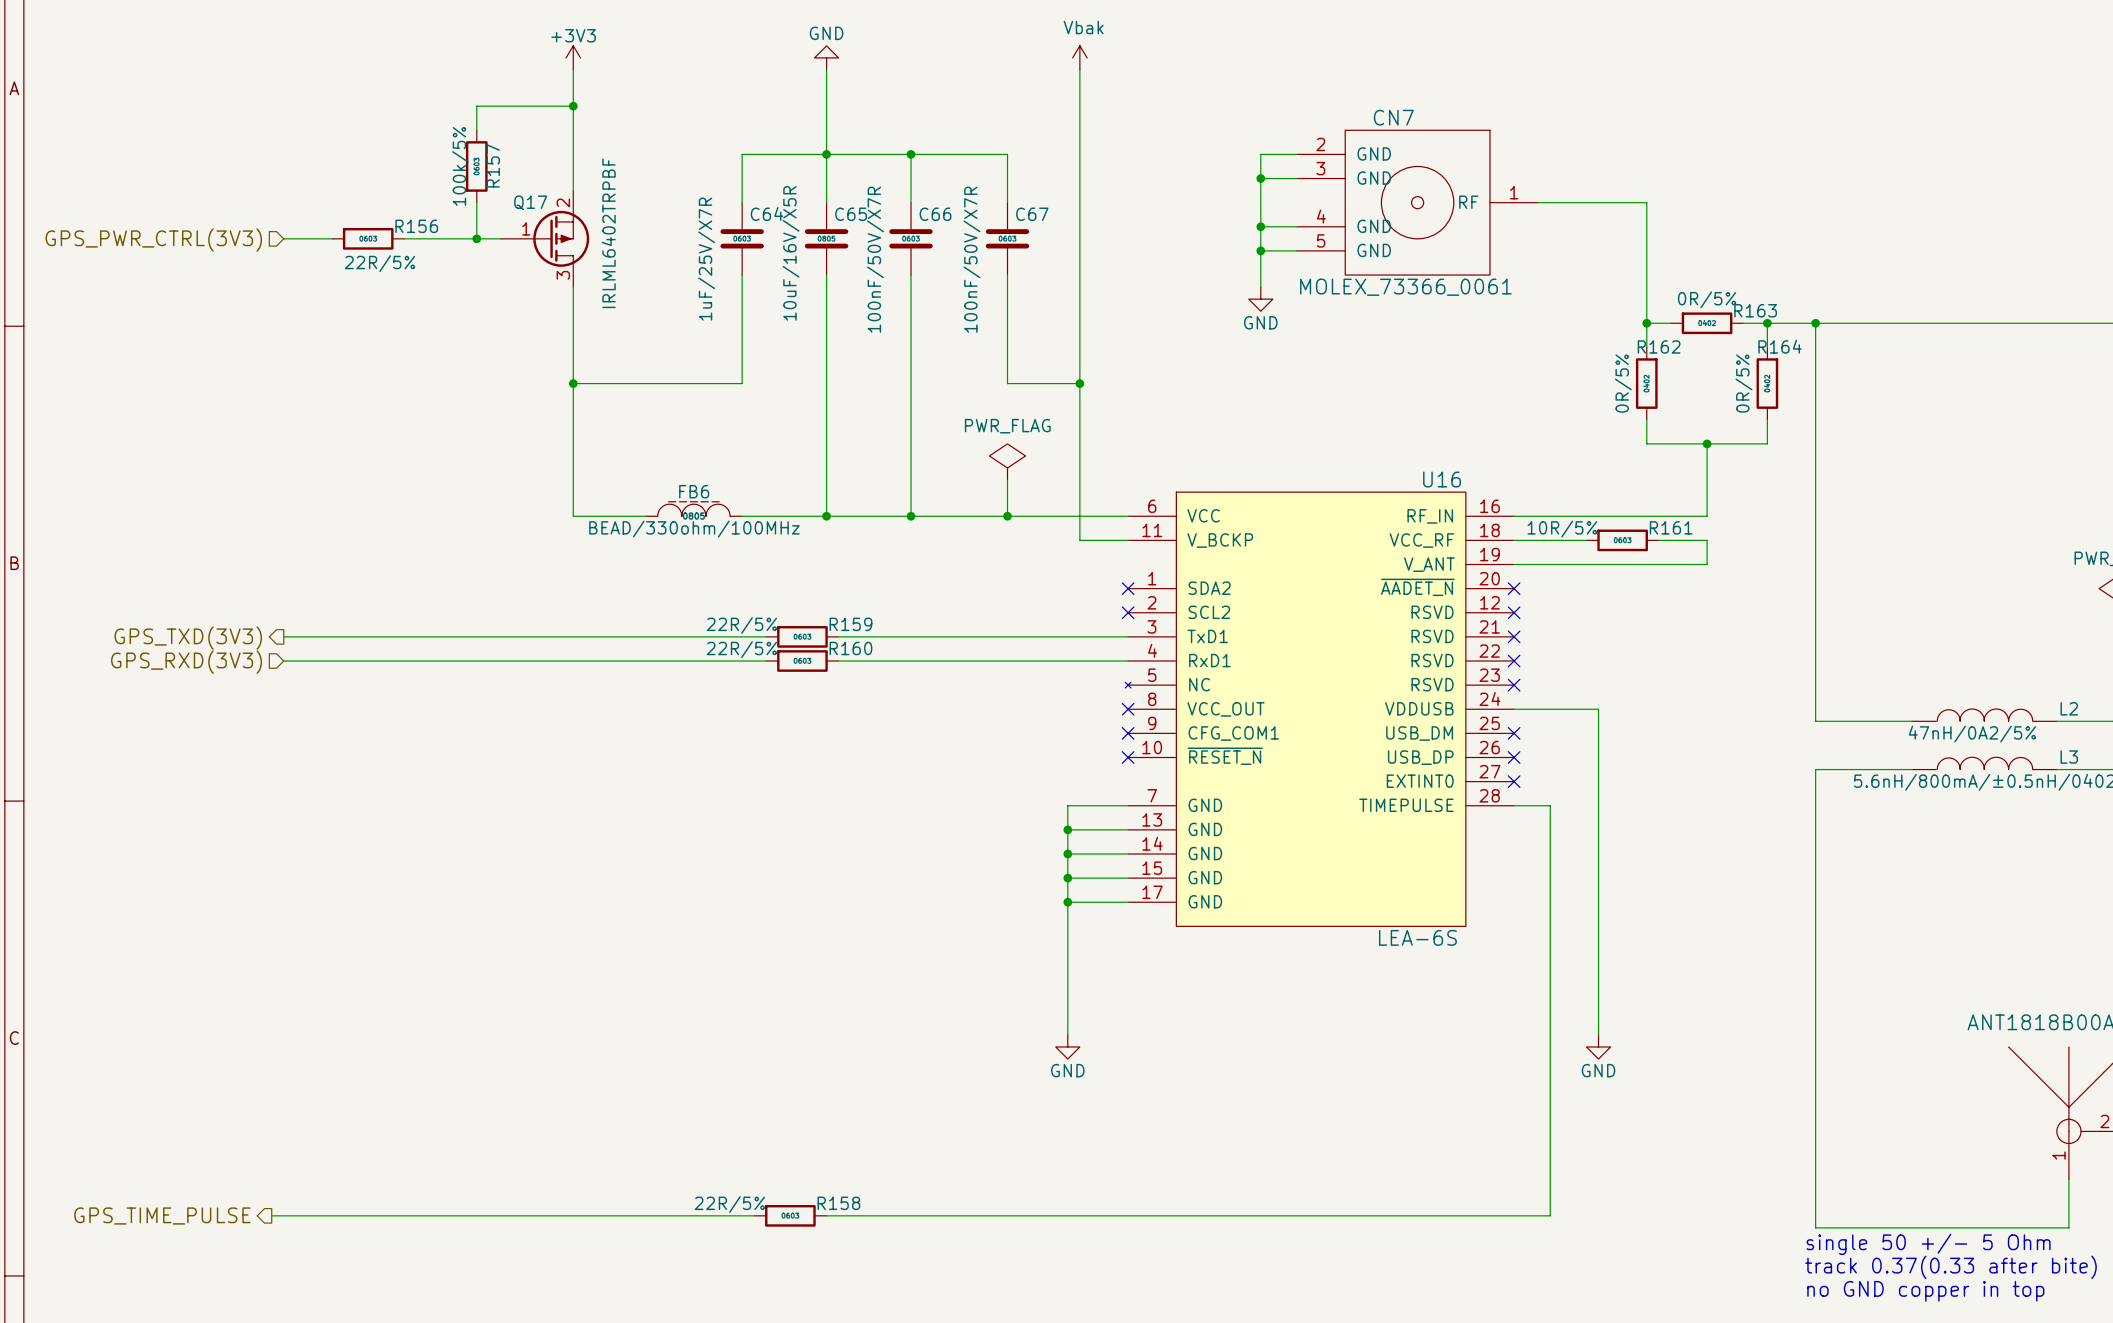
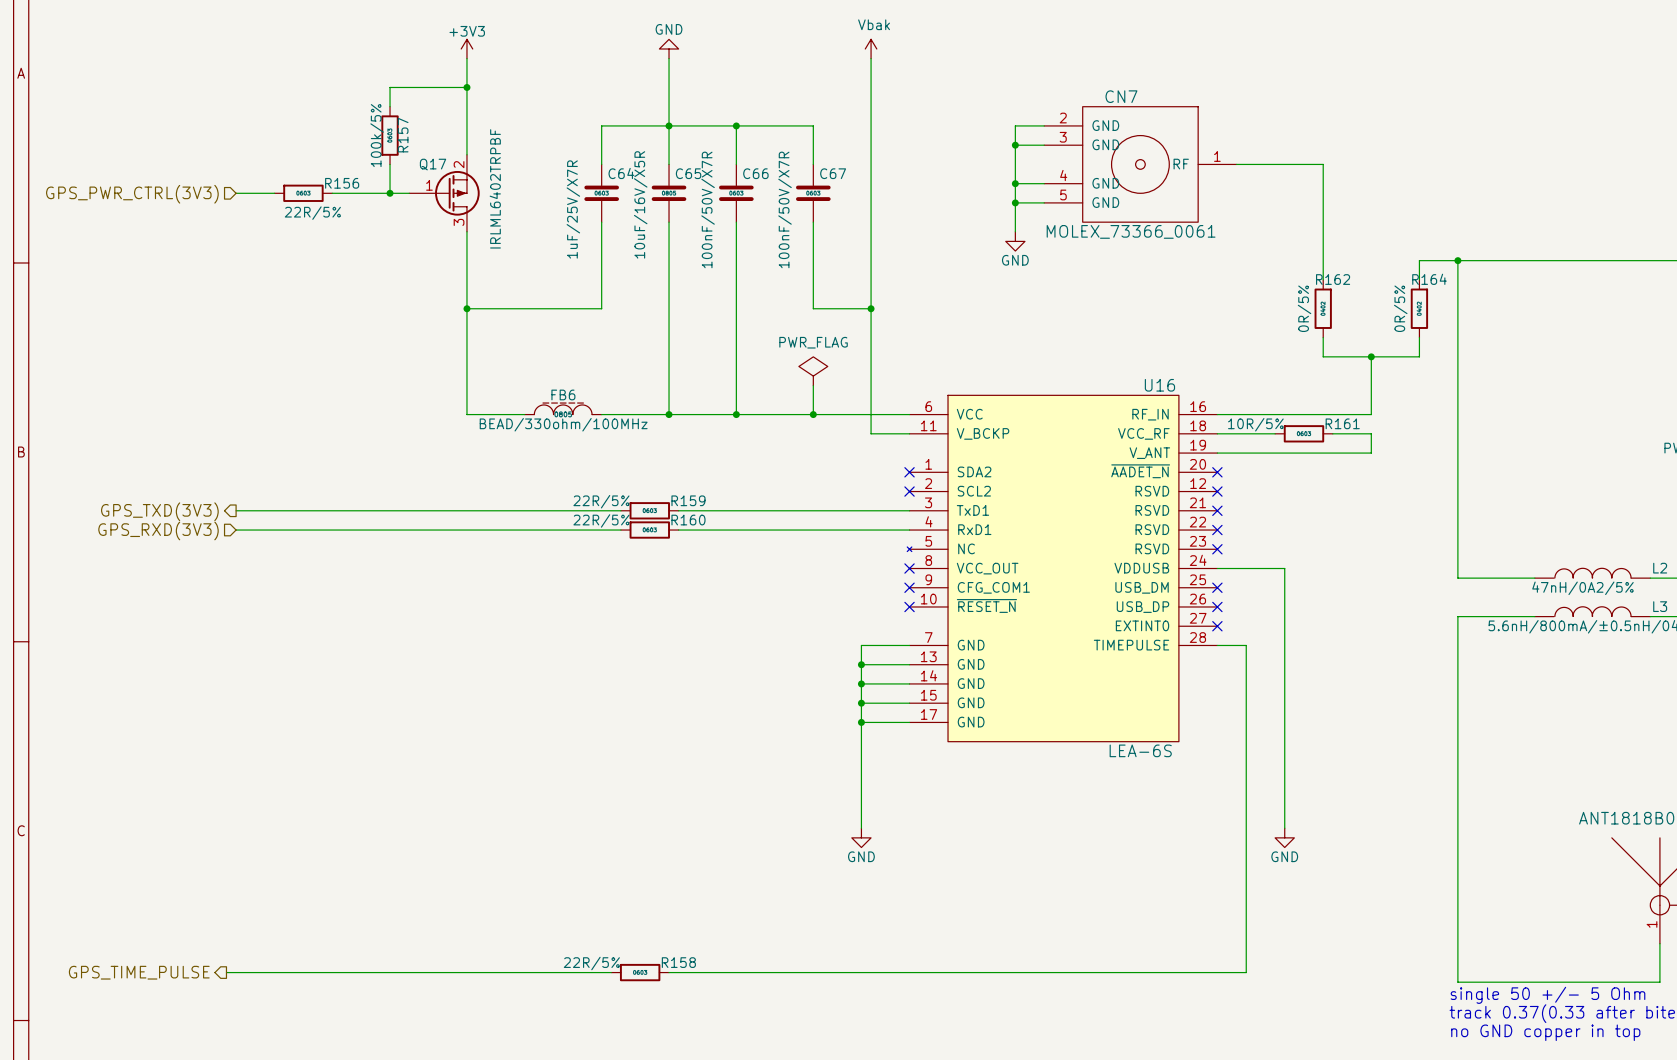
wire: (1646, 323) (1670, 323) -> none
junction: (1646, 323) -> none
R163: 0R/5% (1707, 323) -> none
wire: (1743, 323) (1767, 323) -> none
junction: (1767, 323) -> none

